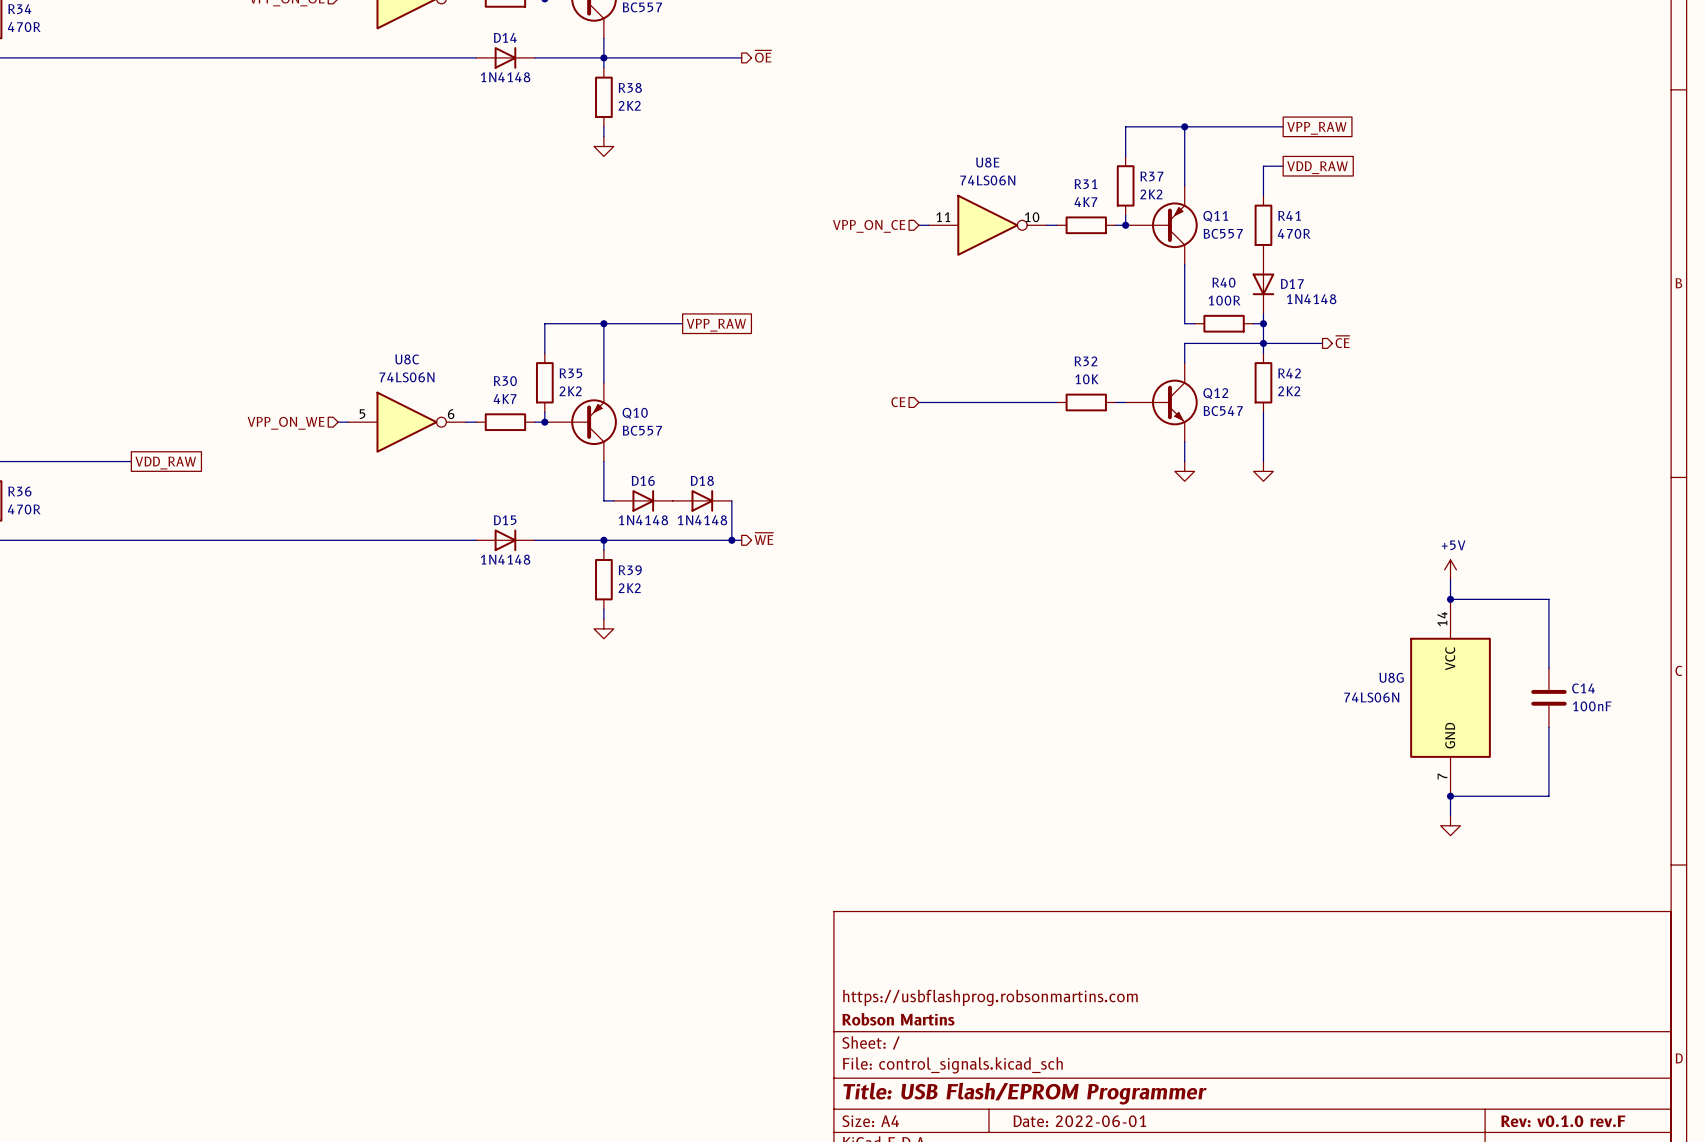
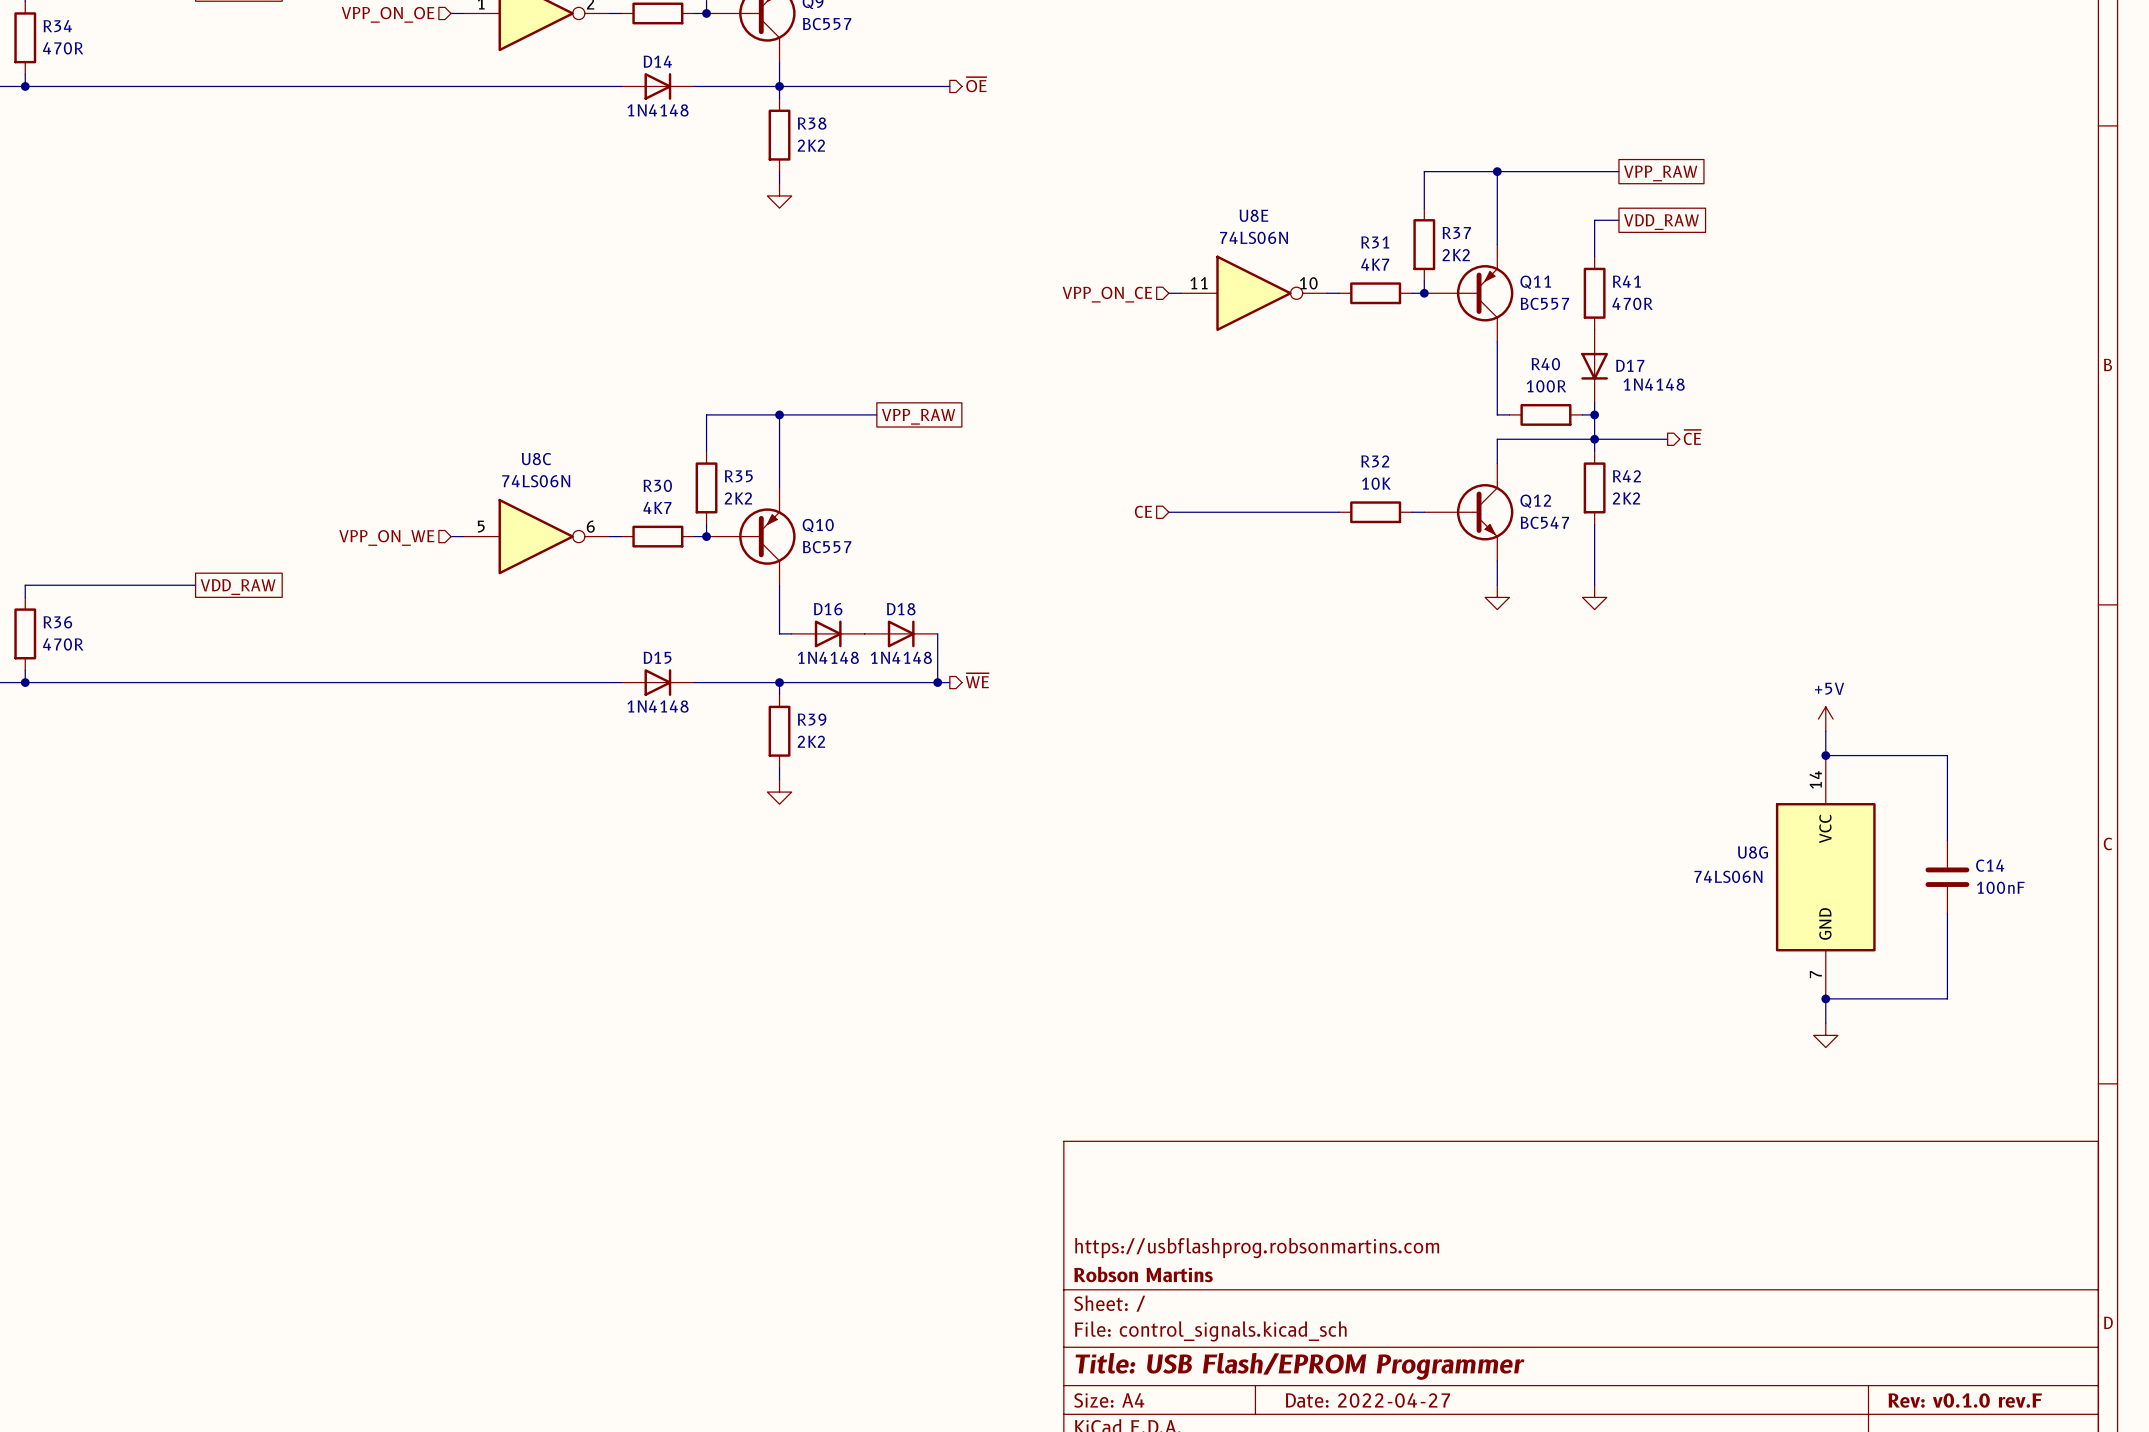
title block: Date: 2022-06-01 (1079, 1121) -> Date: 2022-04-27 (1367, 1400)

